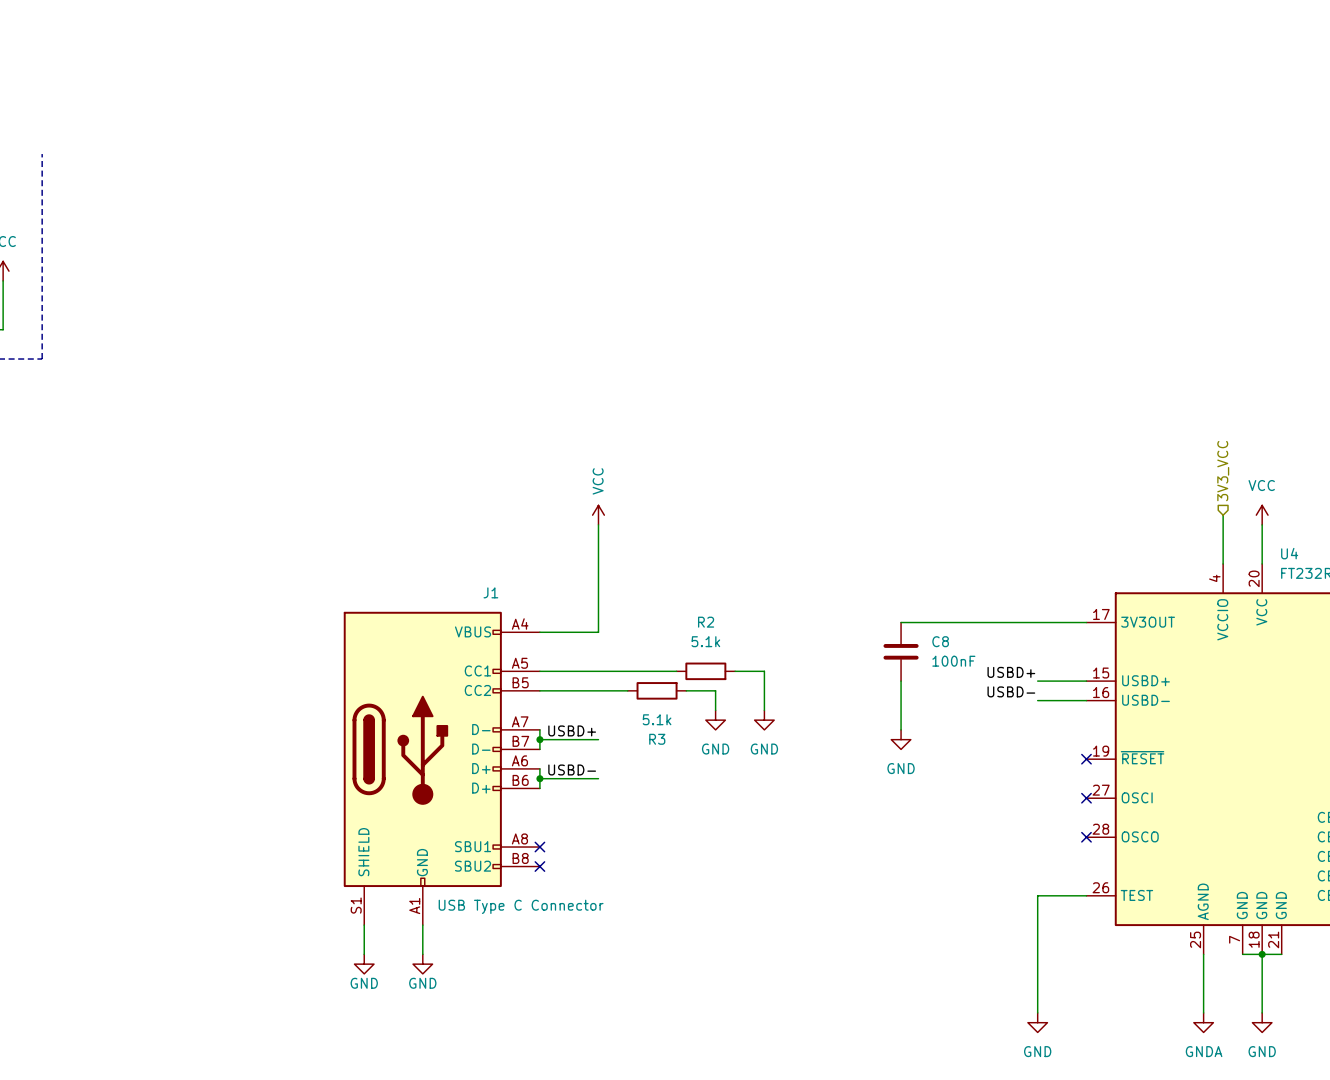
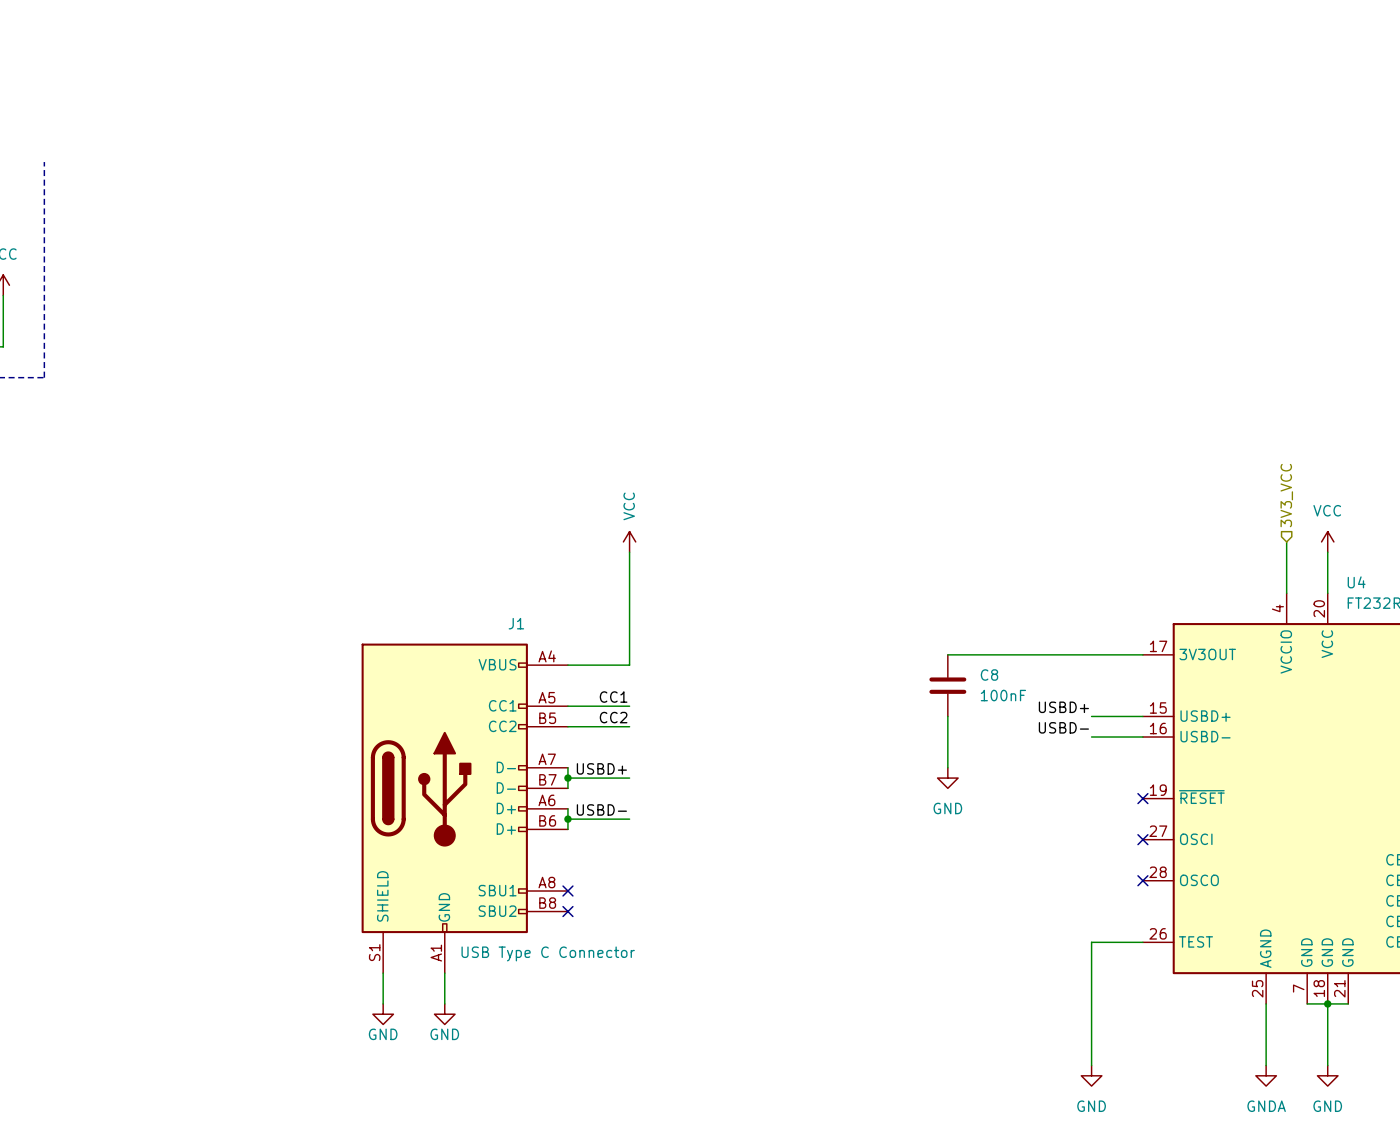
label: none -> CC1 (613, 697)
wire: (598, 671) (676, 671) -> none
R2: 5.1k (705, 671) -> none
wire: (735, 671) (764, 671) (764, 710) -> none
label: none -> CC2 (613, 717)
wire: (598, 690) (627, 690) -> none
R3: 5.1k (657, 690) -> none
wire: (686, 690) (715, 690) (715, 710) -> none
power symbol: GND (715, 720) -> none
power symbol: GND (764, 720) -> none

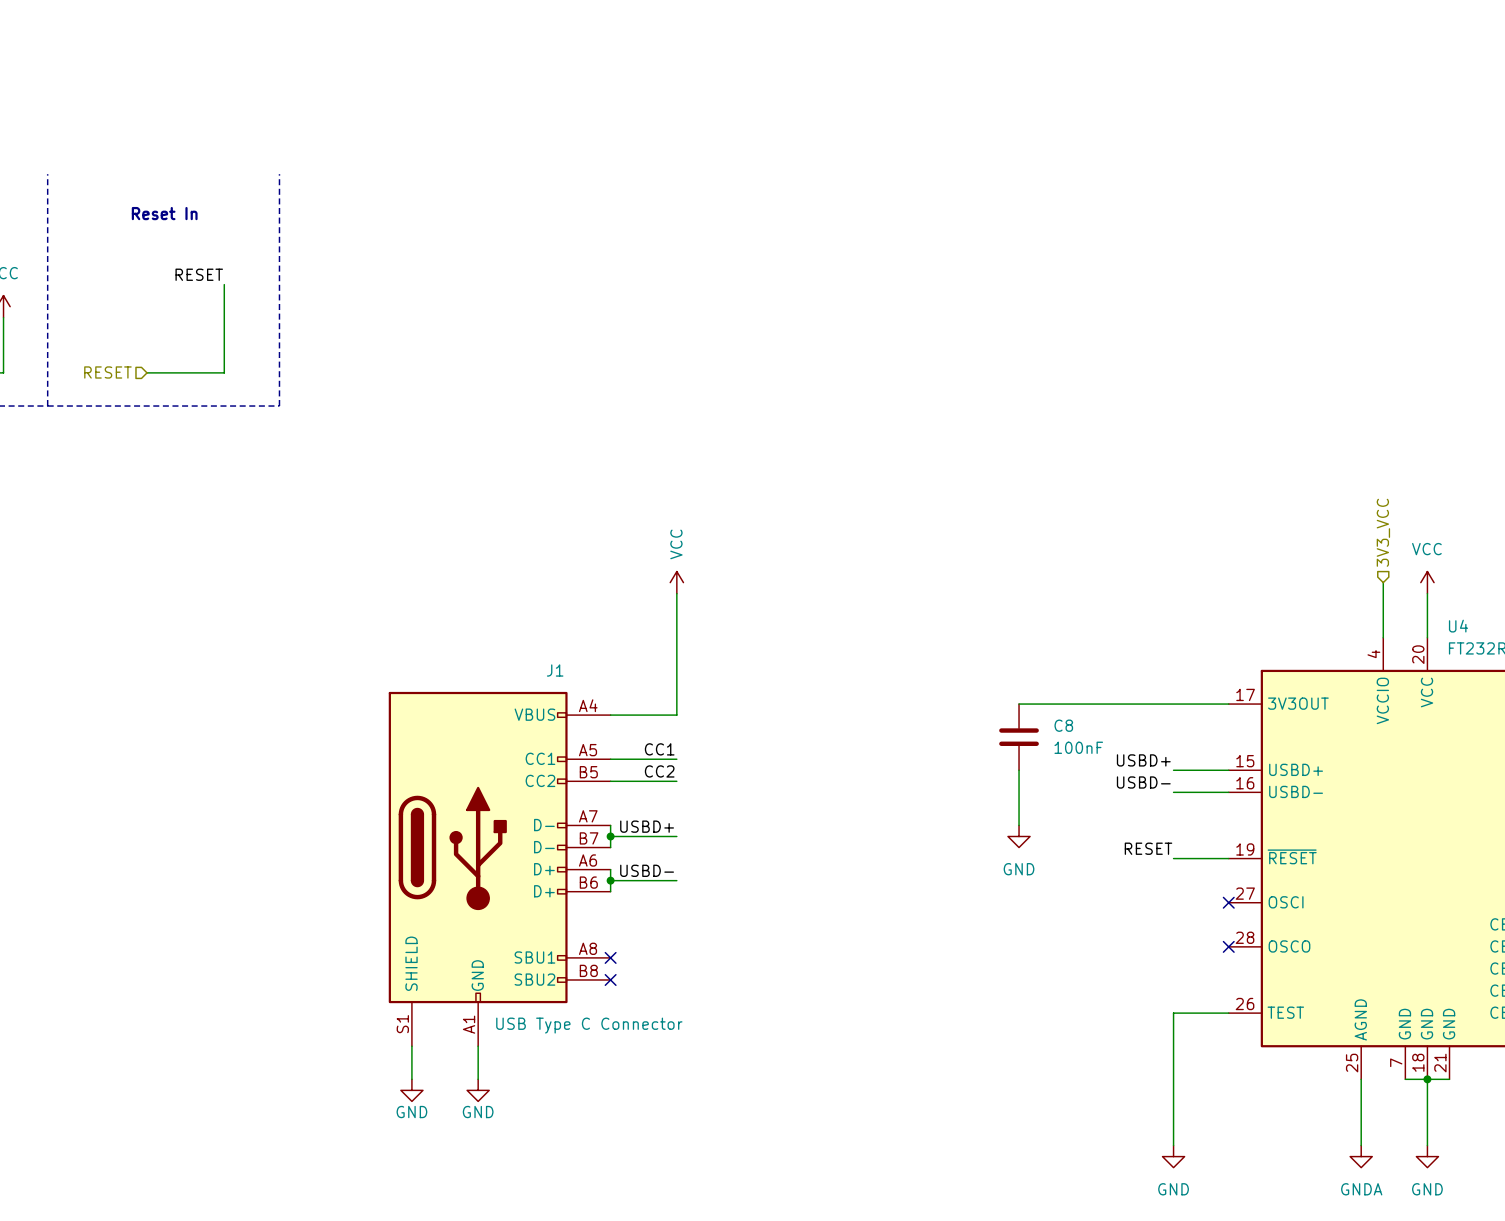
line: none -> (279, 174) (279, 406) (47, 406)
text: none -> Reset In (164, 213)
label: none -> RESET (199, 274)
wire: none -> (224, 284) (224, 372) (147, 372)
hierarchical label: none -> RESET (107, 372)
label: none -> RESET (1148, 848)
wire: none -> (1173, 858) (1228, 858)
no-connect mark: (1142, 798) -> none

